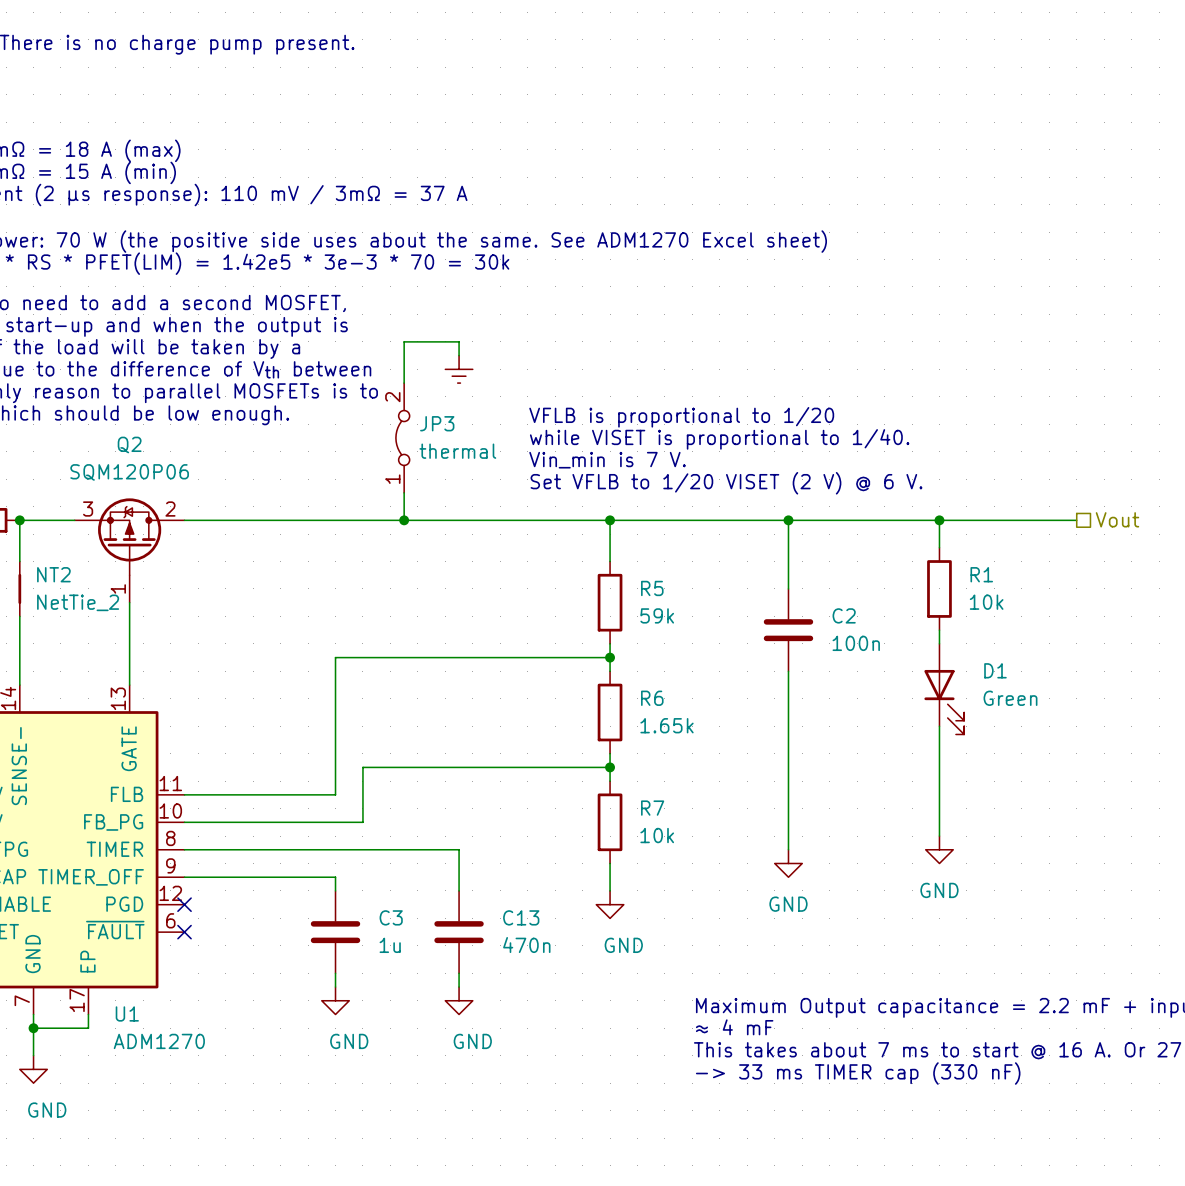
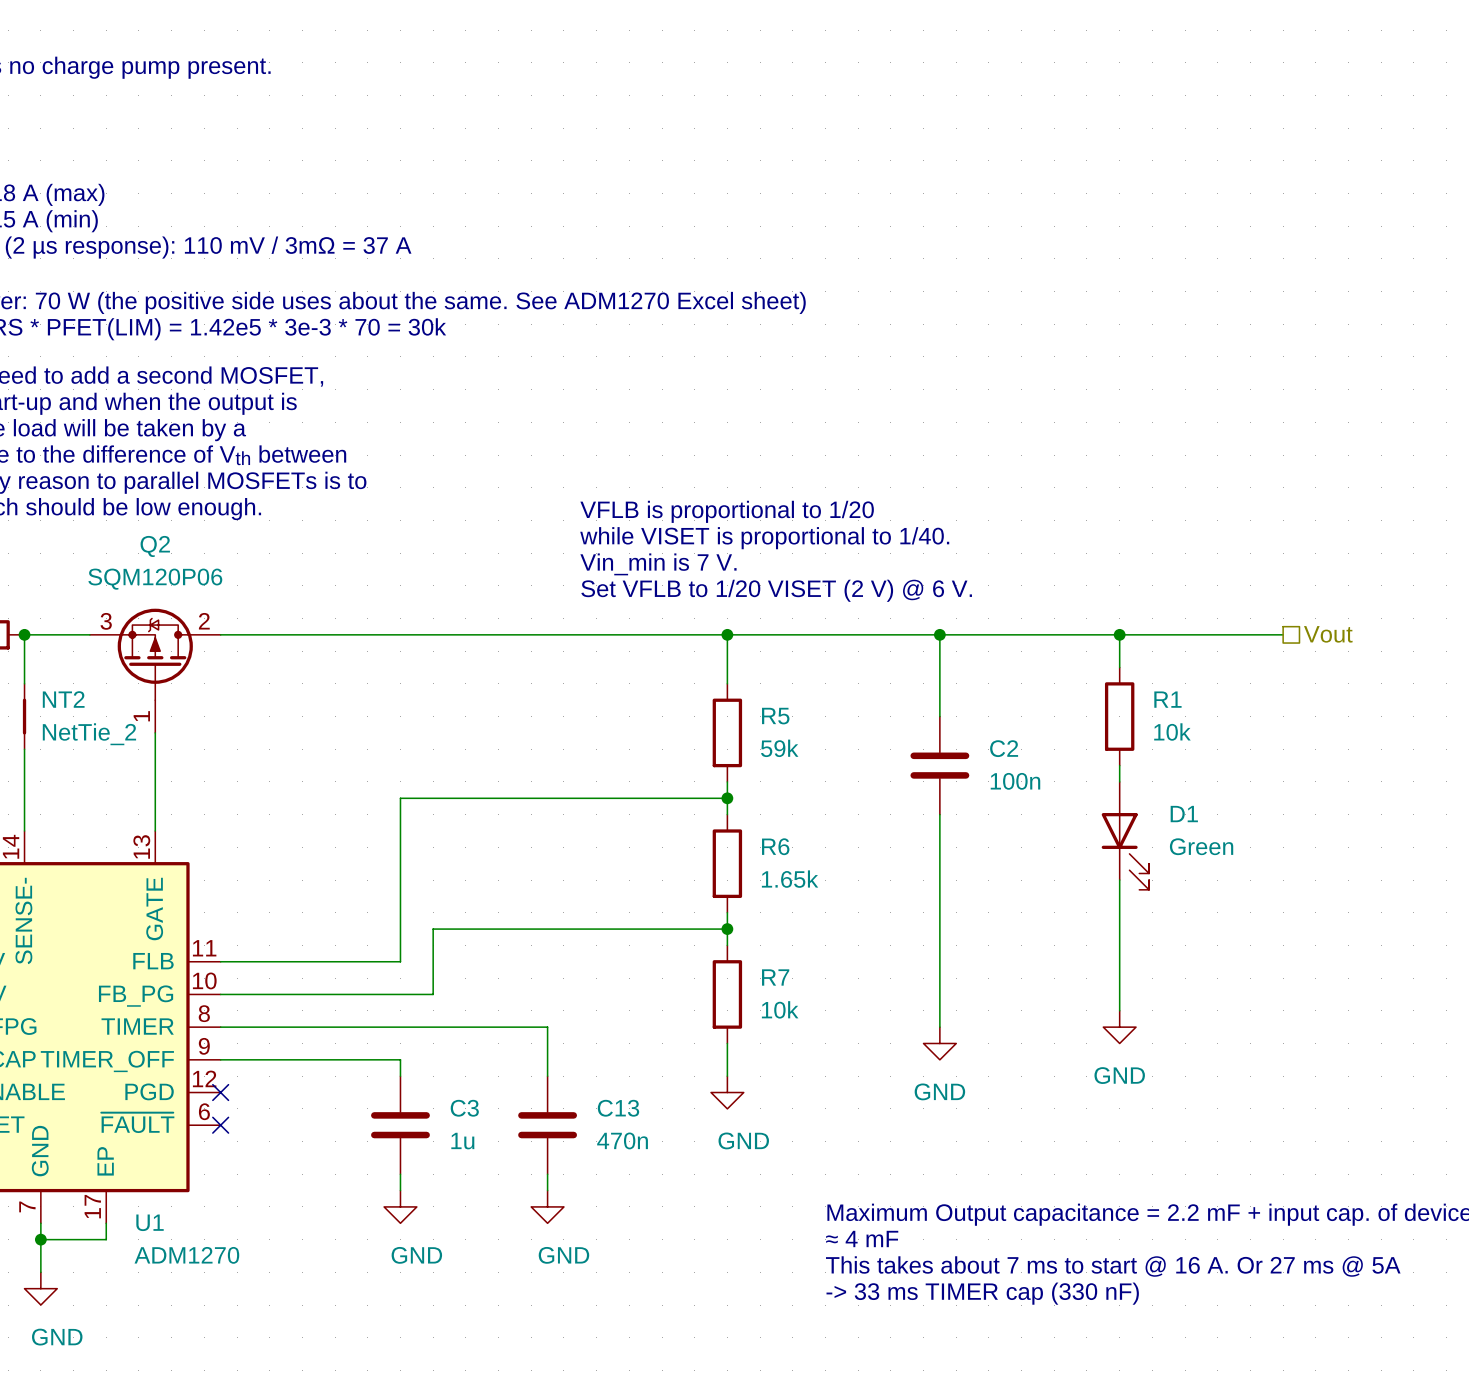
wire: (459, 355) (459, 341) (404, 341) (404, 383) -> none
power symbol: (459, 369) -> none
text position: VFLB is proportional to 1/20 (681, 417) -> VFLB is proportional to 1/20 (727, 511)
JP3: thermal (402, 437) -> none
text position: while VISET is proportional to 1/40. (719, 439) -> while VISET is proportional to 1/40. (764, 538)
text position: Vin_min is 7 V. (607, 460) -> Vin_min is 7 V. (658, 564)
text position: Set VFLB to 1/20 VISET (2 V) @ 6 V. (726, 483) -> Set VFLB to 1/20 VISET (2 V) @ 6 V. (776, 590)
wire: (404, 492) (404, 520) -> none
junction: (404, 520) -> none

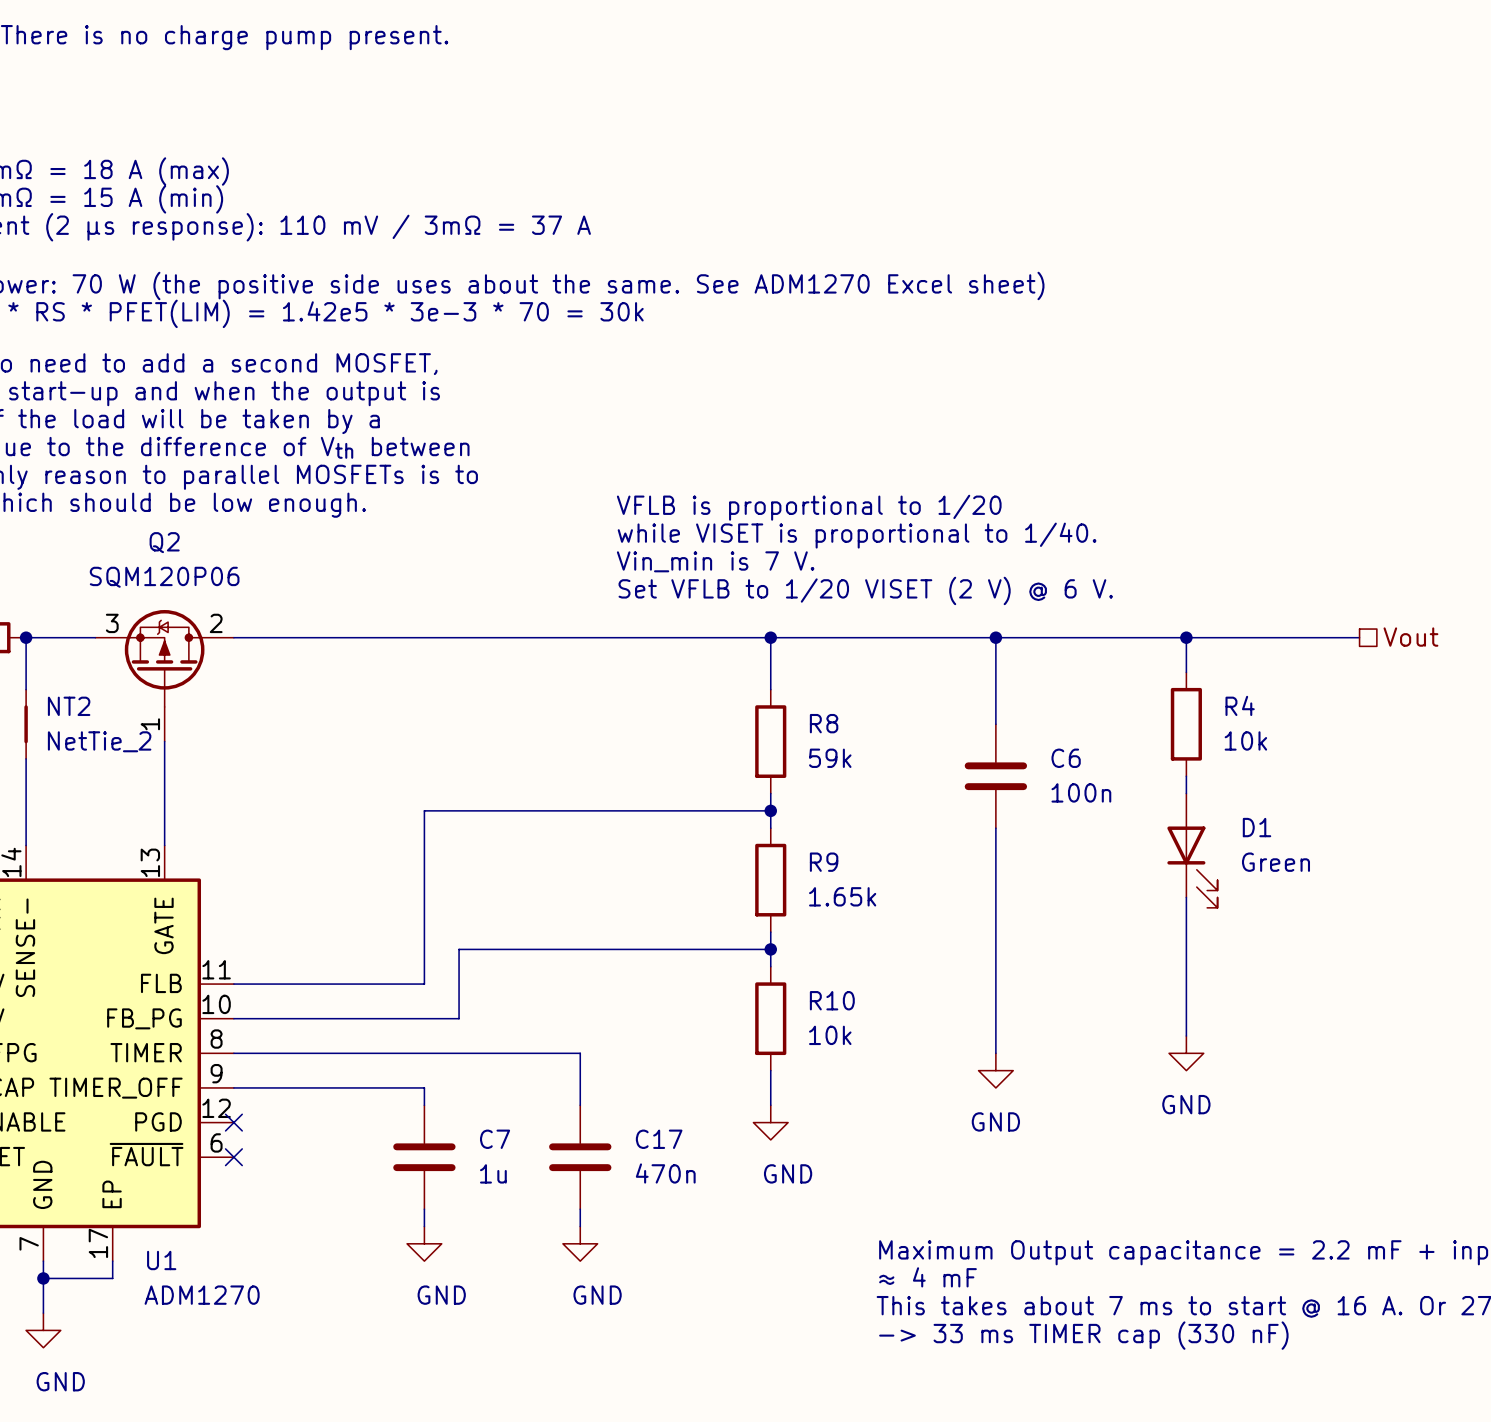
R1 name: R1 (1167, 699) -> R4 (1240, 705)
R5 name: R5 (775, 716) -> R8 (824, 723)
C2 name: C2 (1004, 748) -> C6 (1066, 758)
R6 name: R6 (775, 846) -> R9 (824, 862)
R7 name: R7 (775, 977) -> R10 (832, 1000)
C3 name: C3 (464, 1108) -> C7 (495, 1139)
C13 name: C13 (618, 1108) -> C17 (659, 1139)

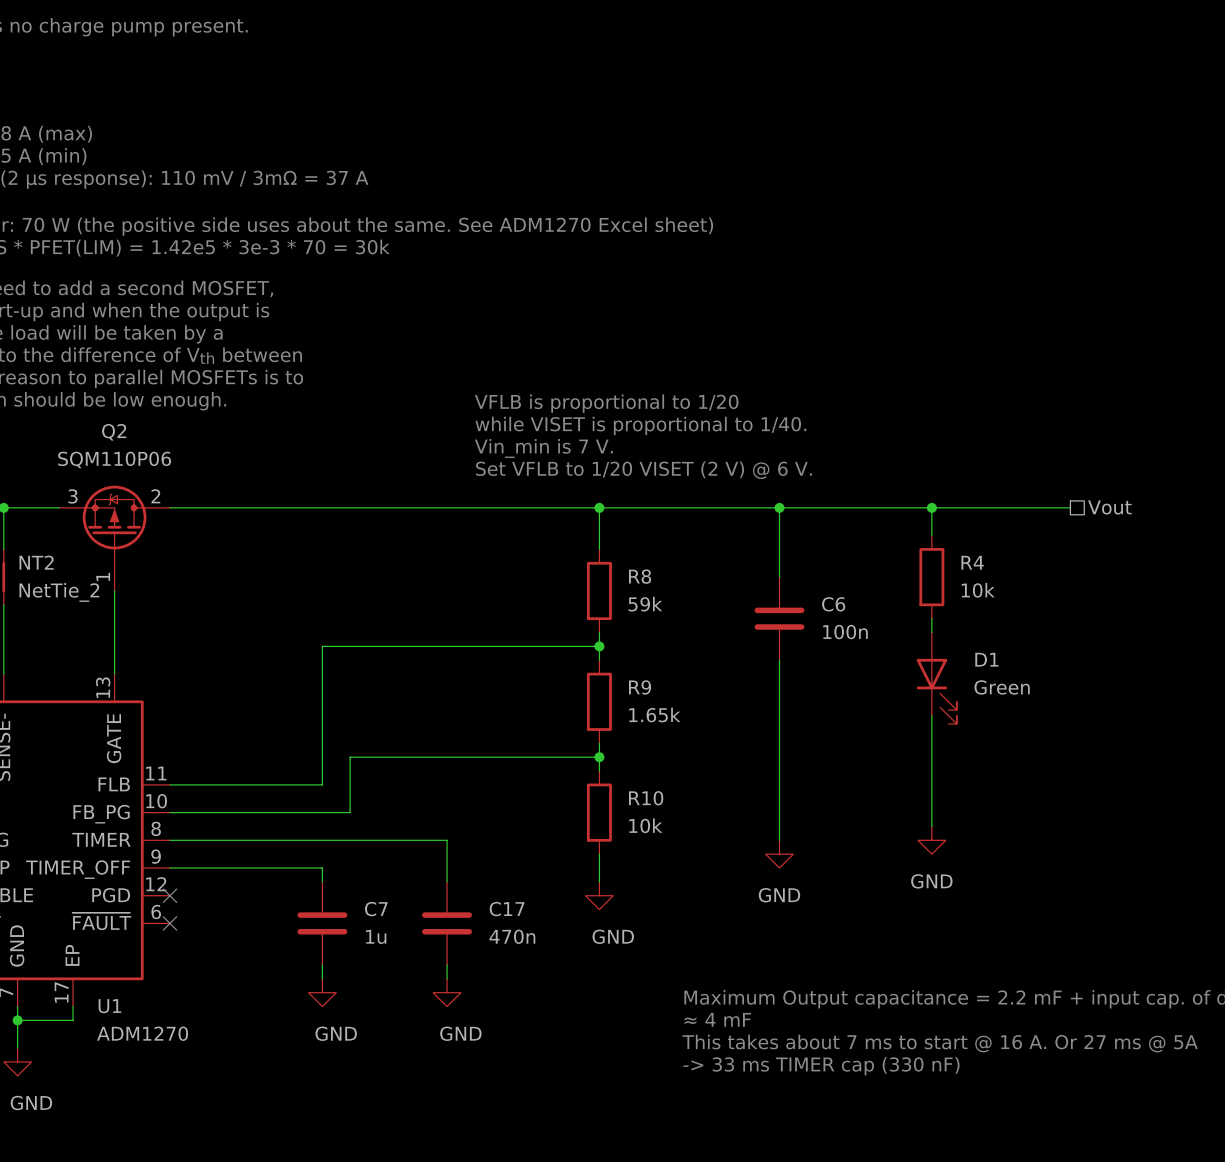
Q2 value: SQM120P06 (164, 577) -> SQM110P06 (114, 459)

